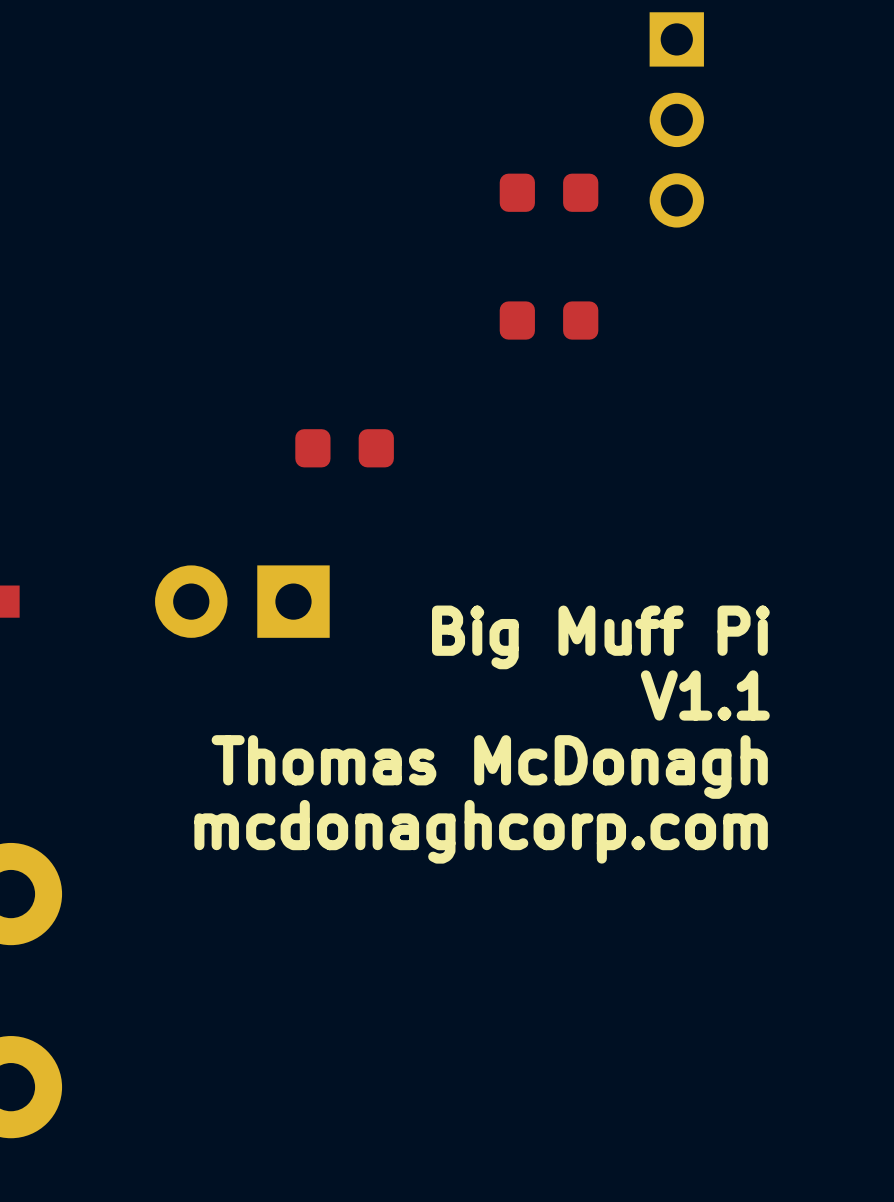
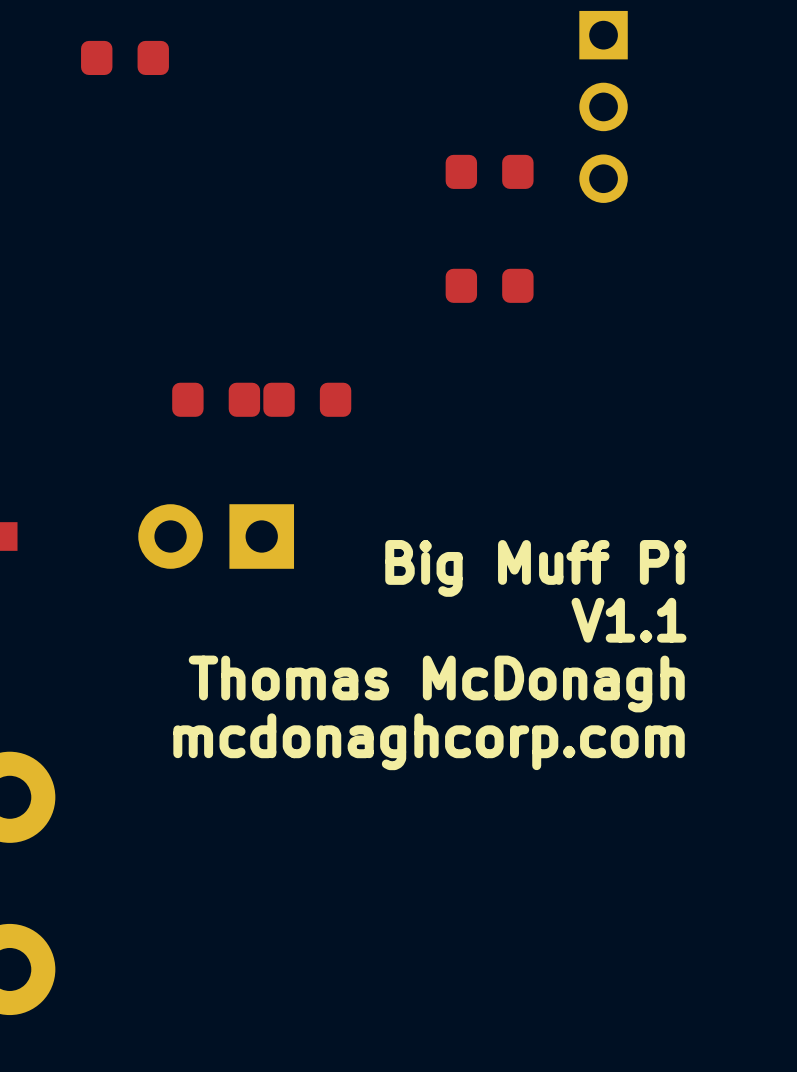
part: none -> (124, 57)
part: none -> (216, 399)

